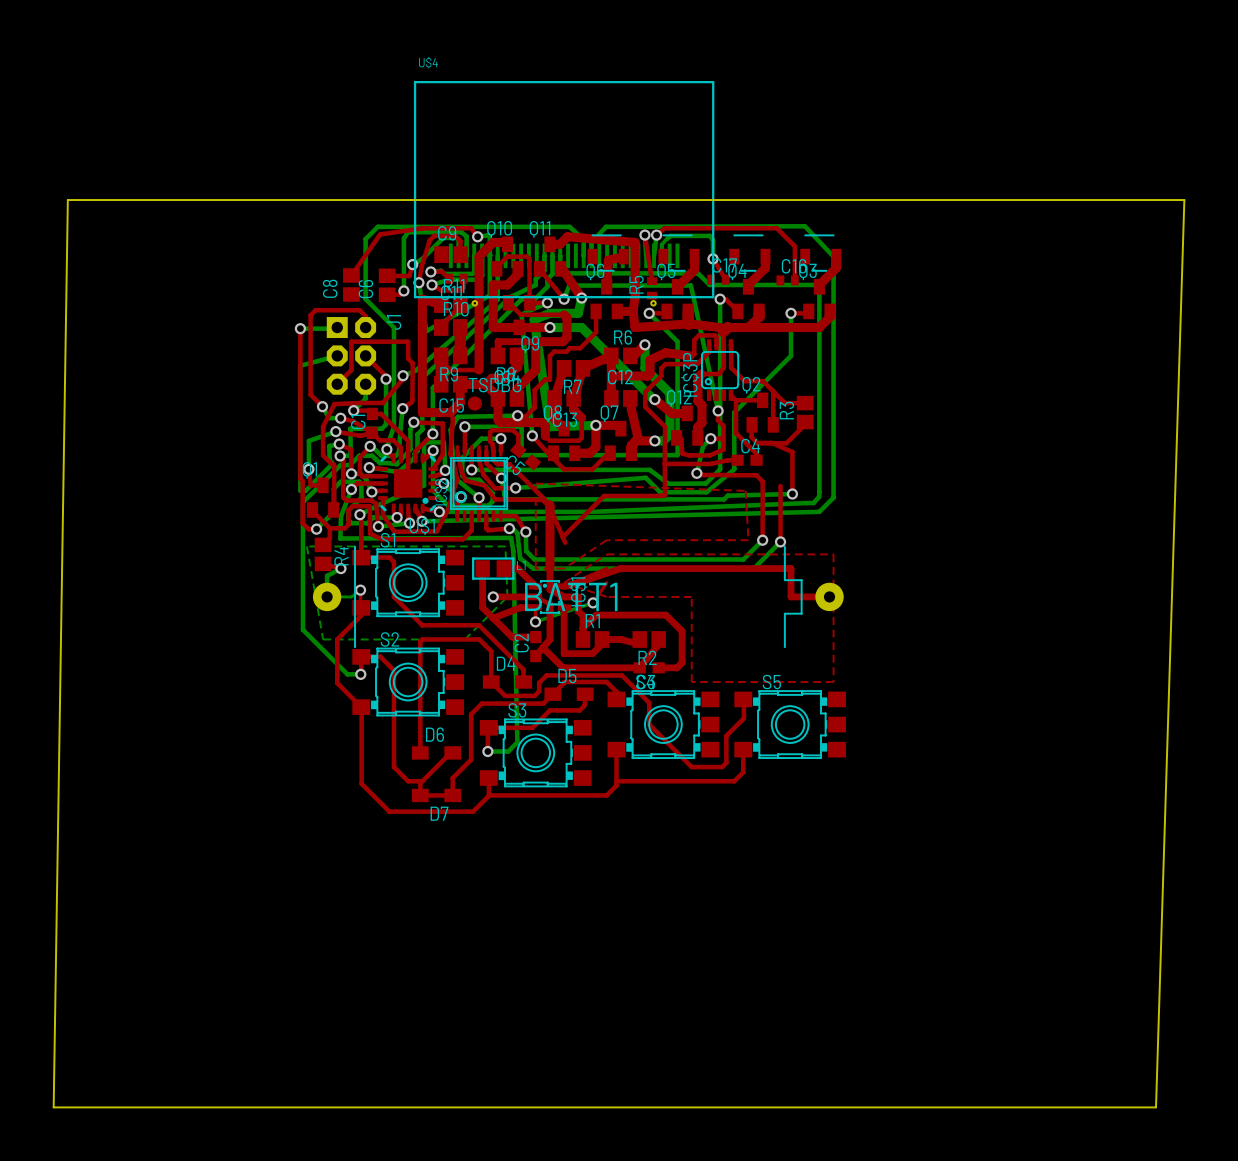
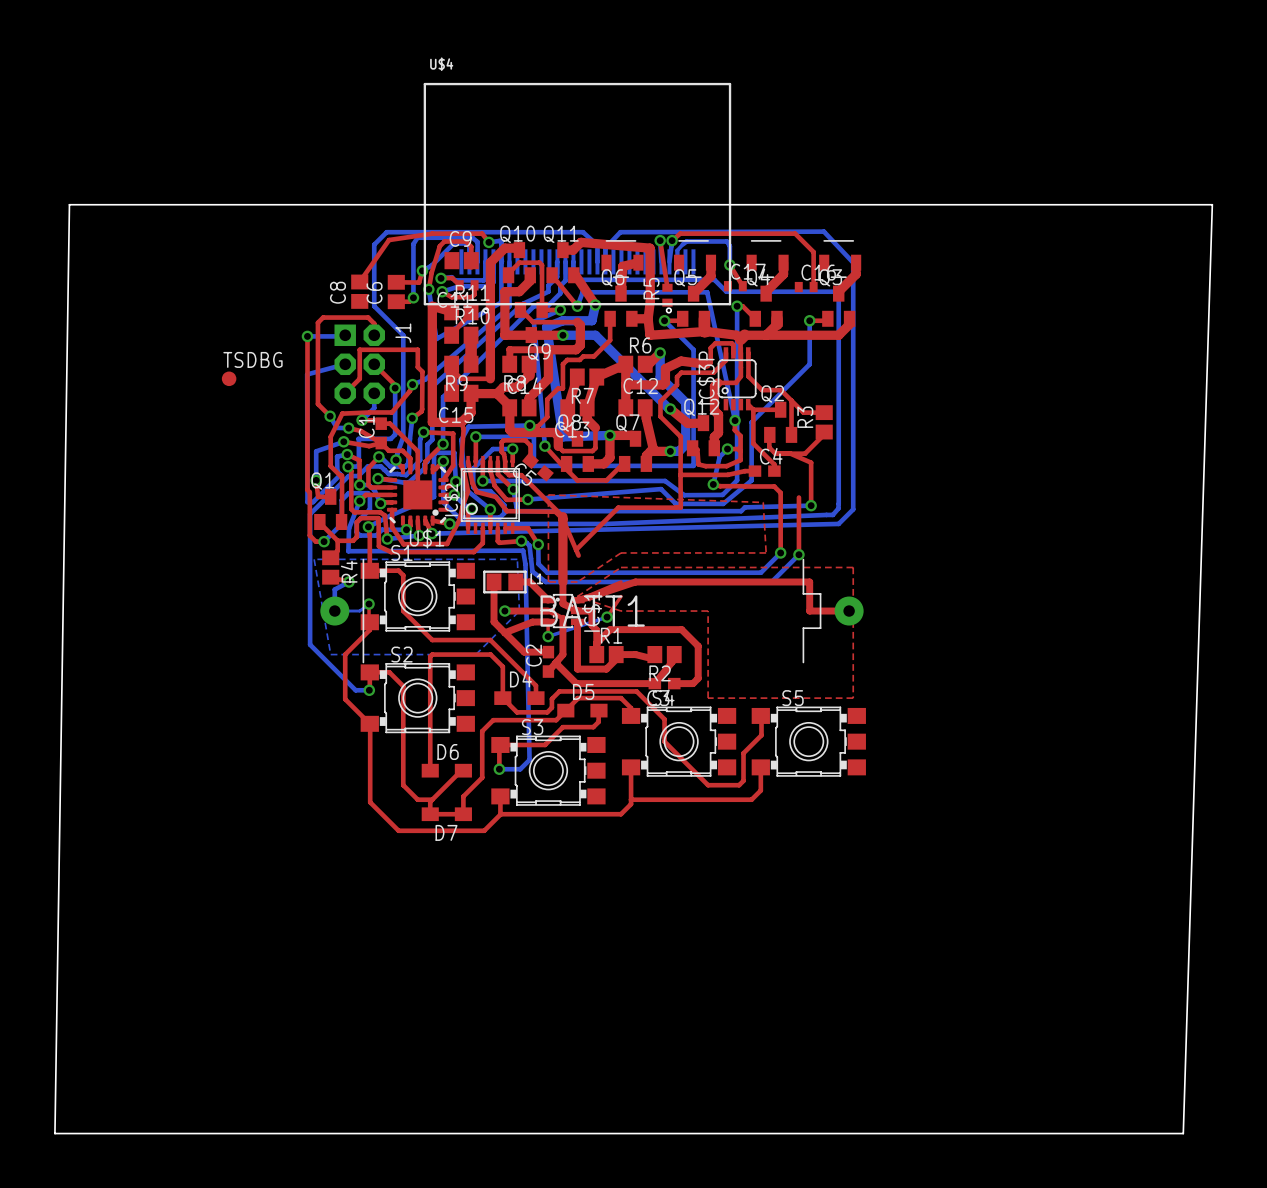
TSDBG position: (474, 403) -> (229, 378)

